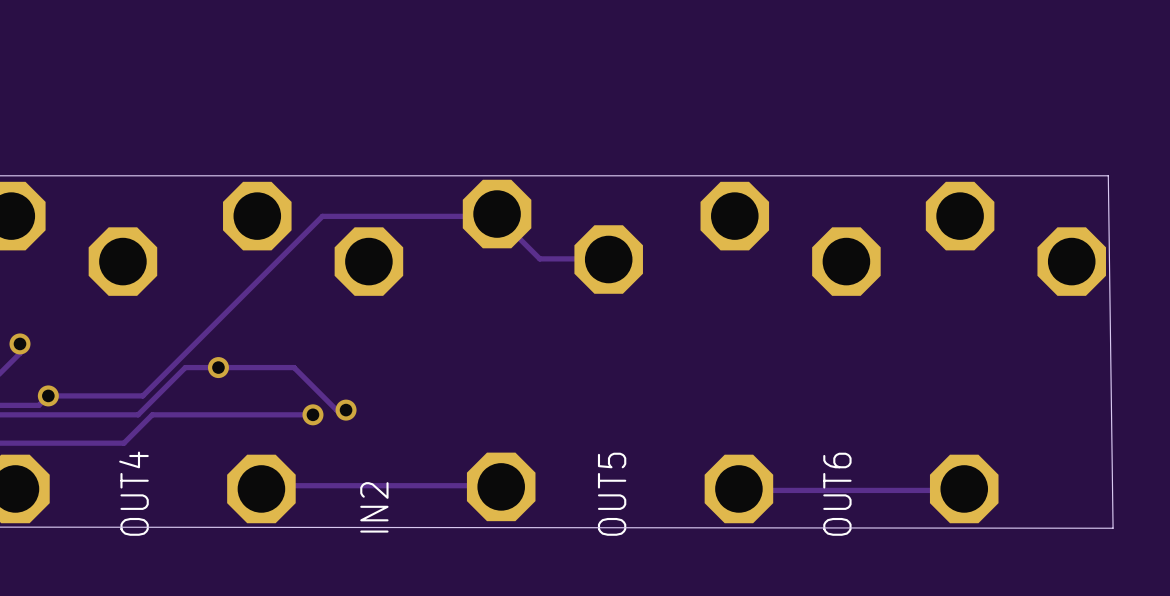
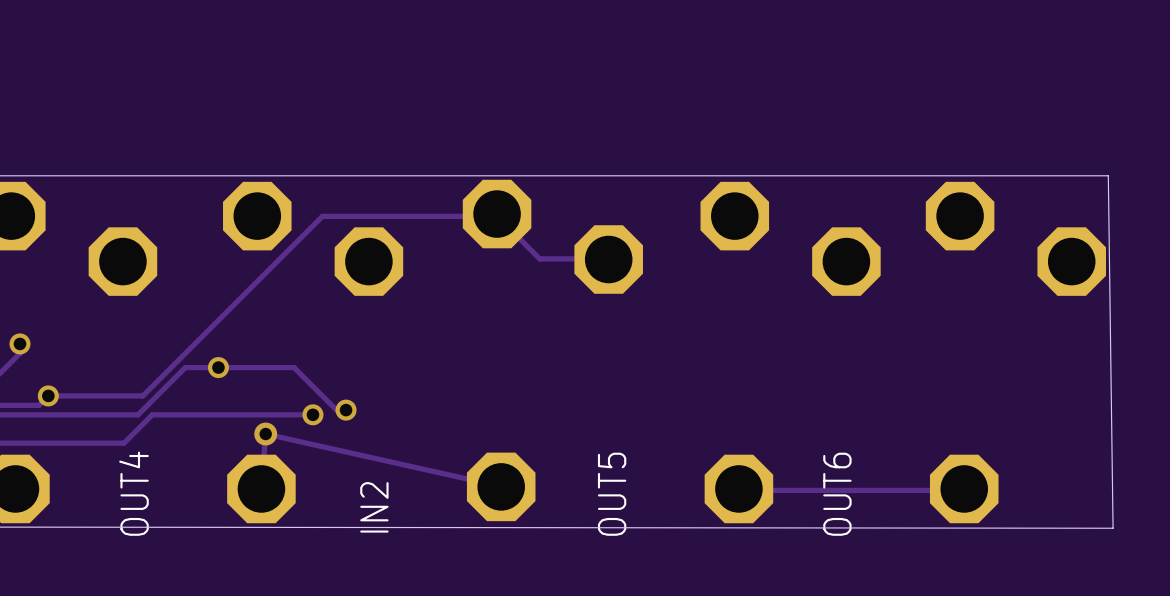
via: none -> (265, 434)
track: (497, 485) (265, 485) (261, 488) -> (497, 485) (265, 434) (261, 488)

